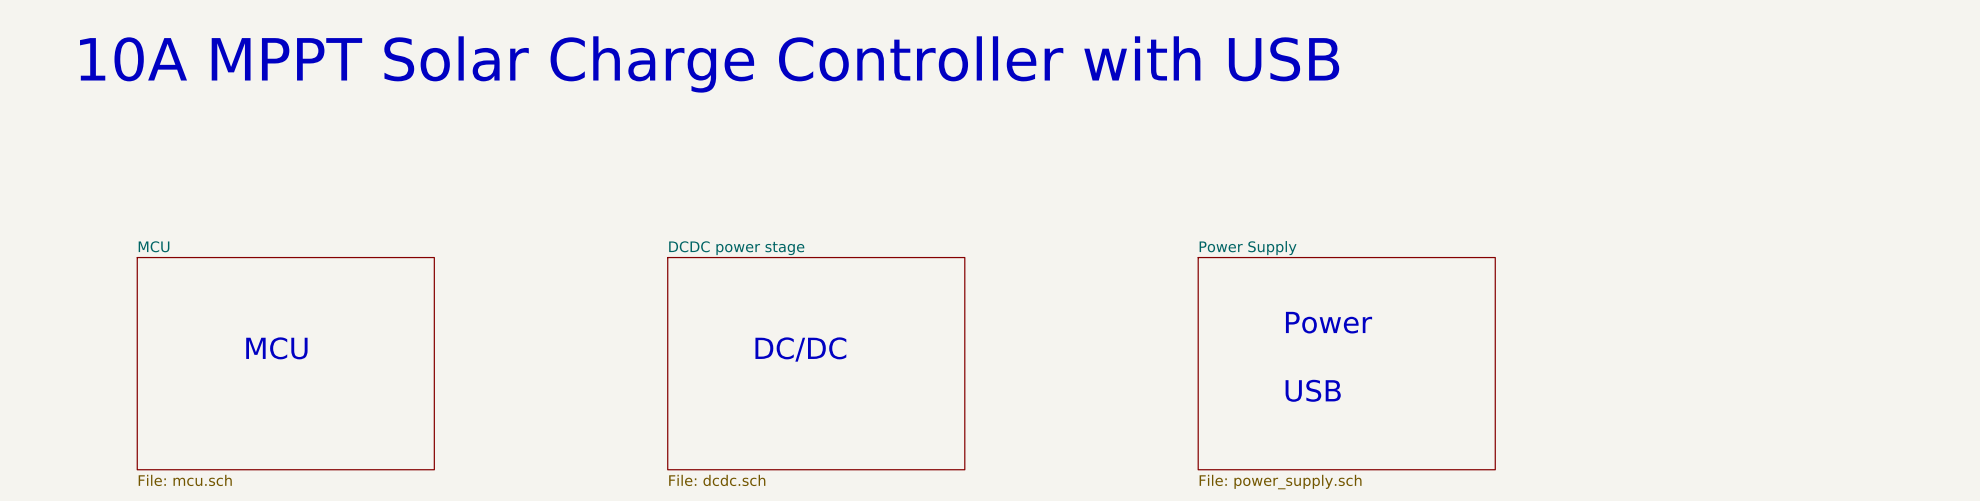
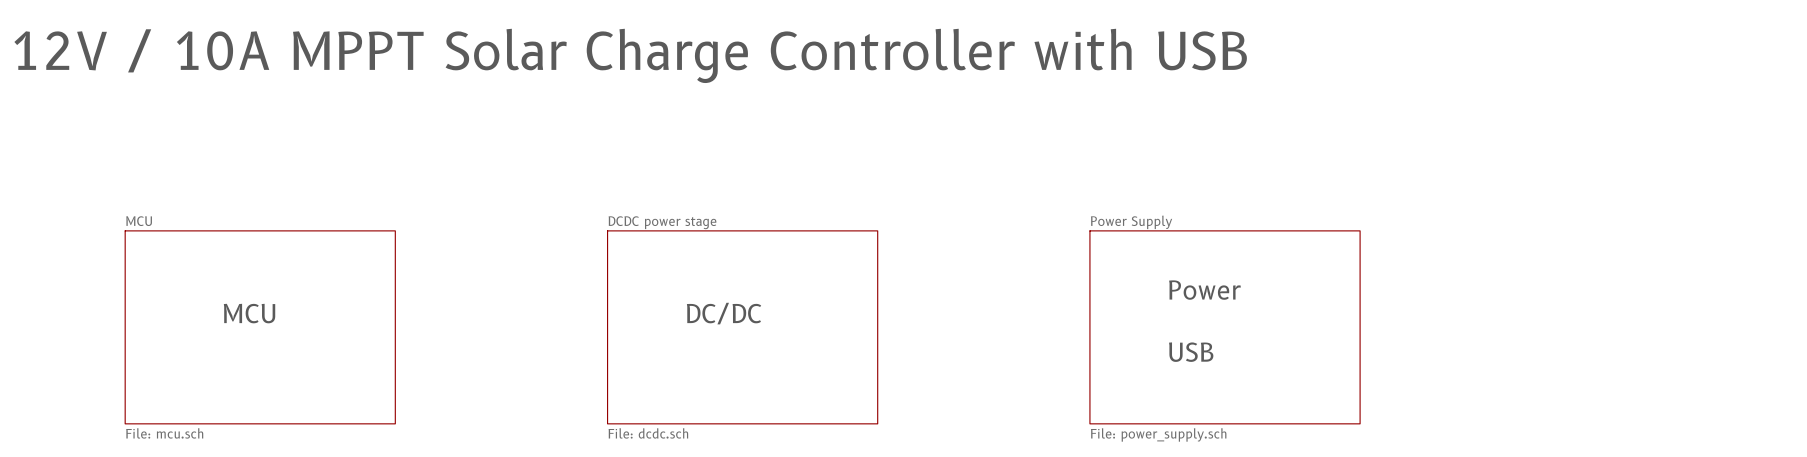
text: 10A MPPT Solar Charge Controller with USB (709, 64) -> 12V / 10A MPPT Solar Charge Controller with USB (630, 55)

